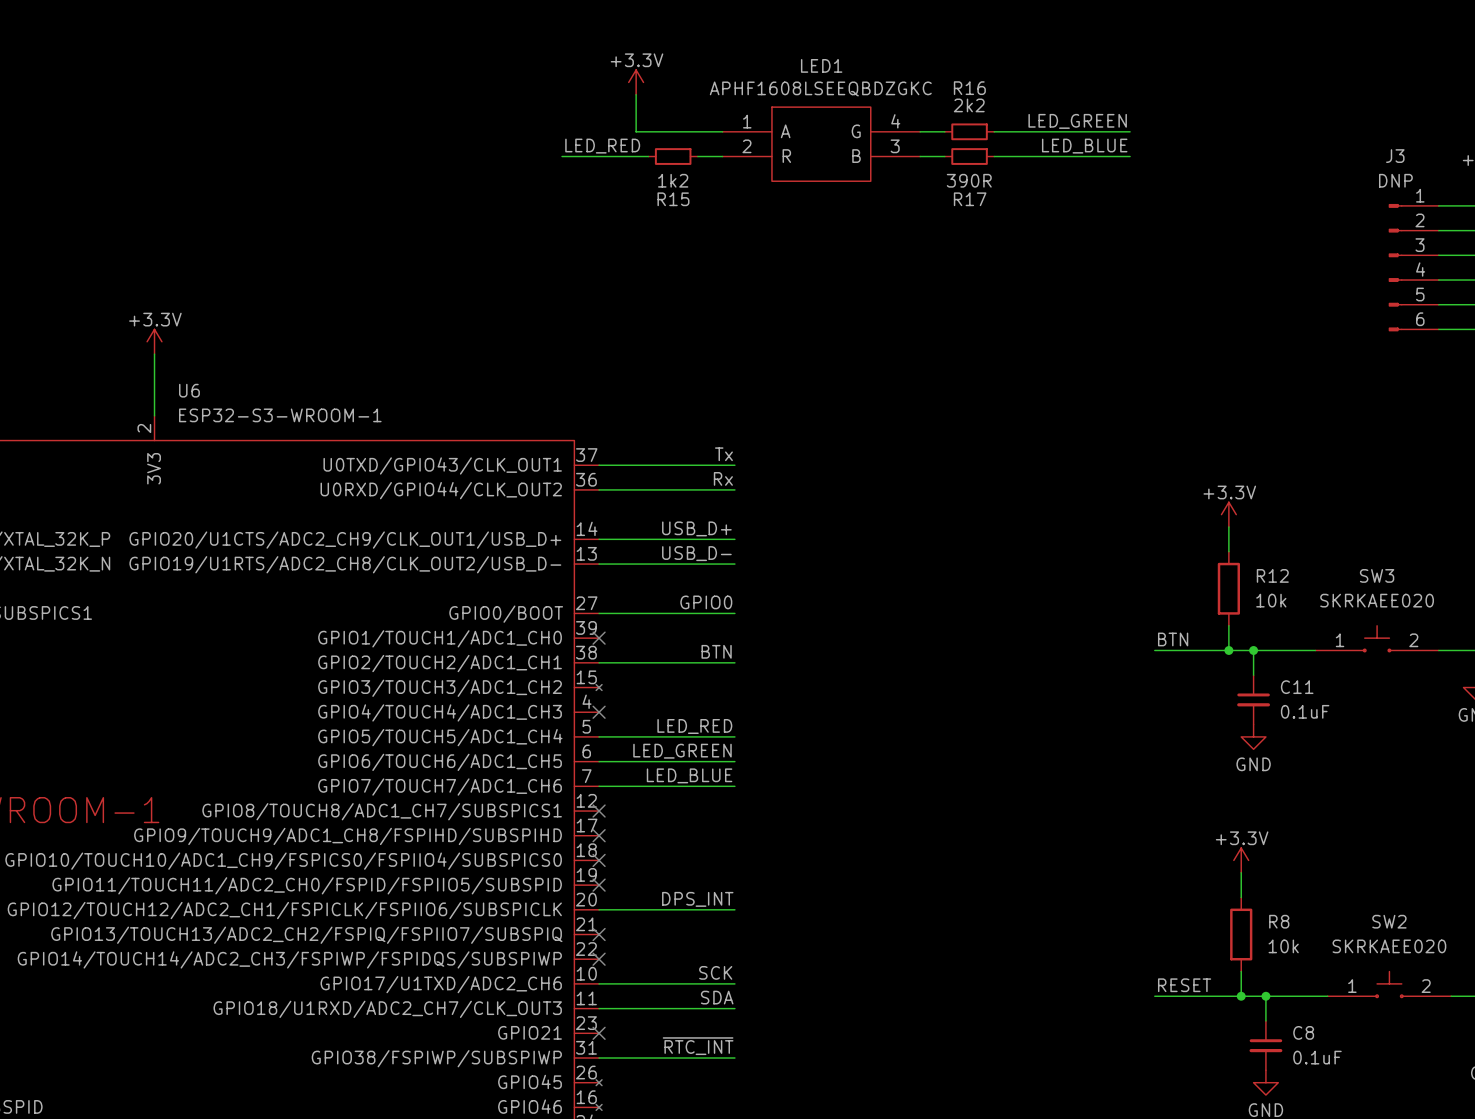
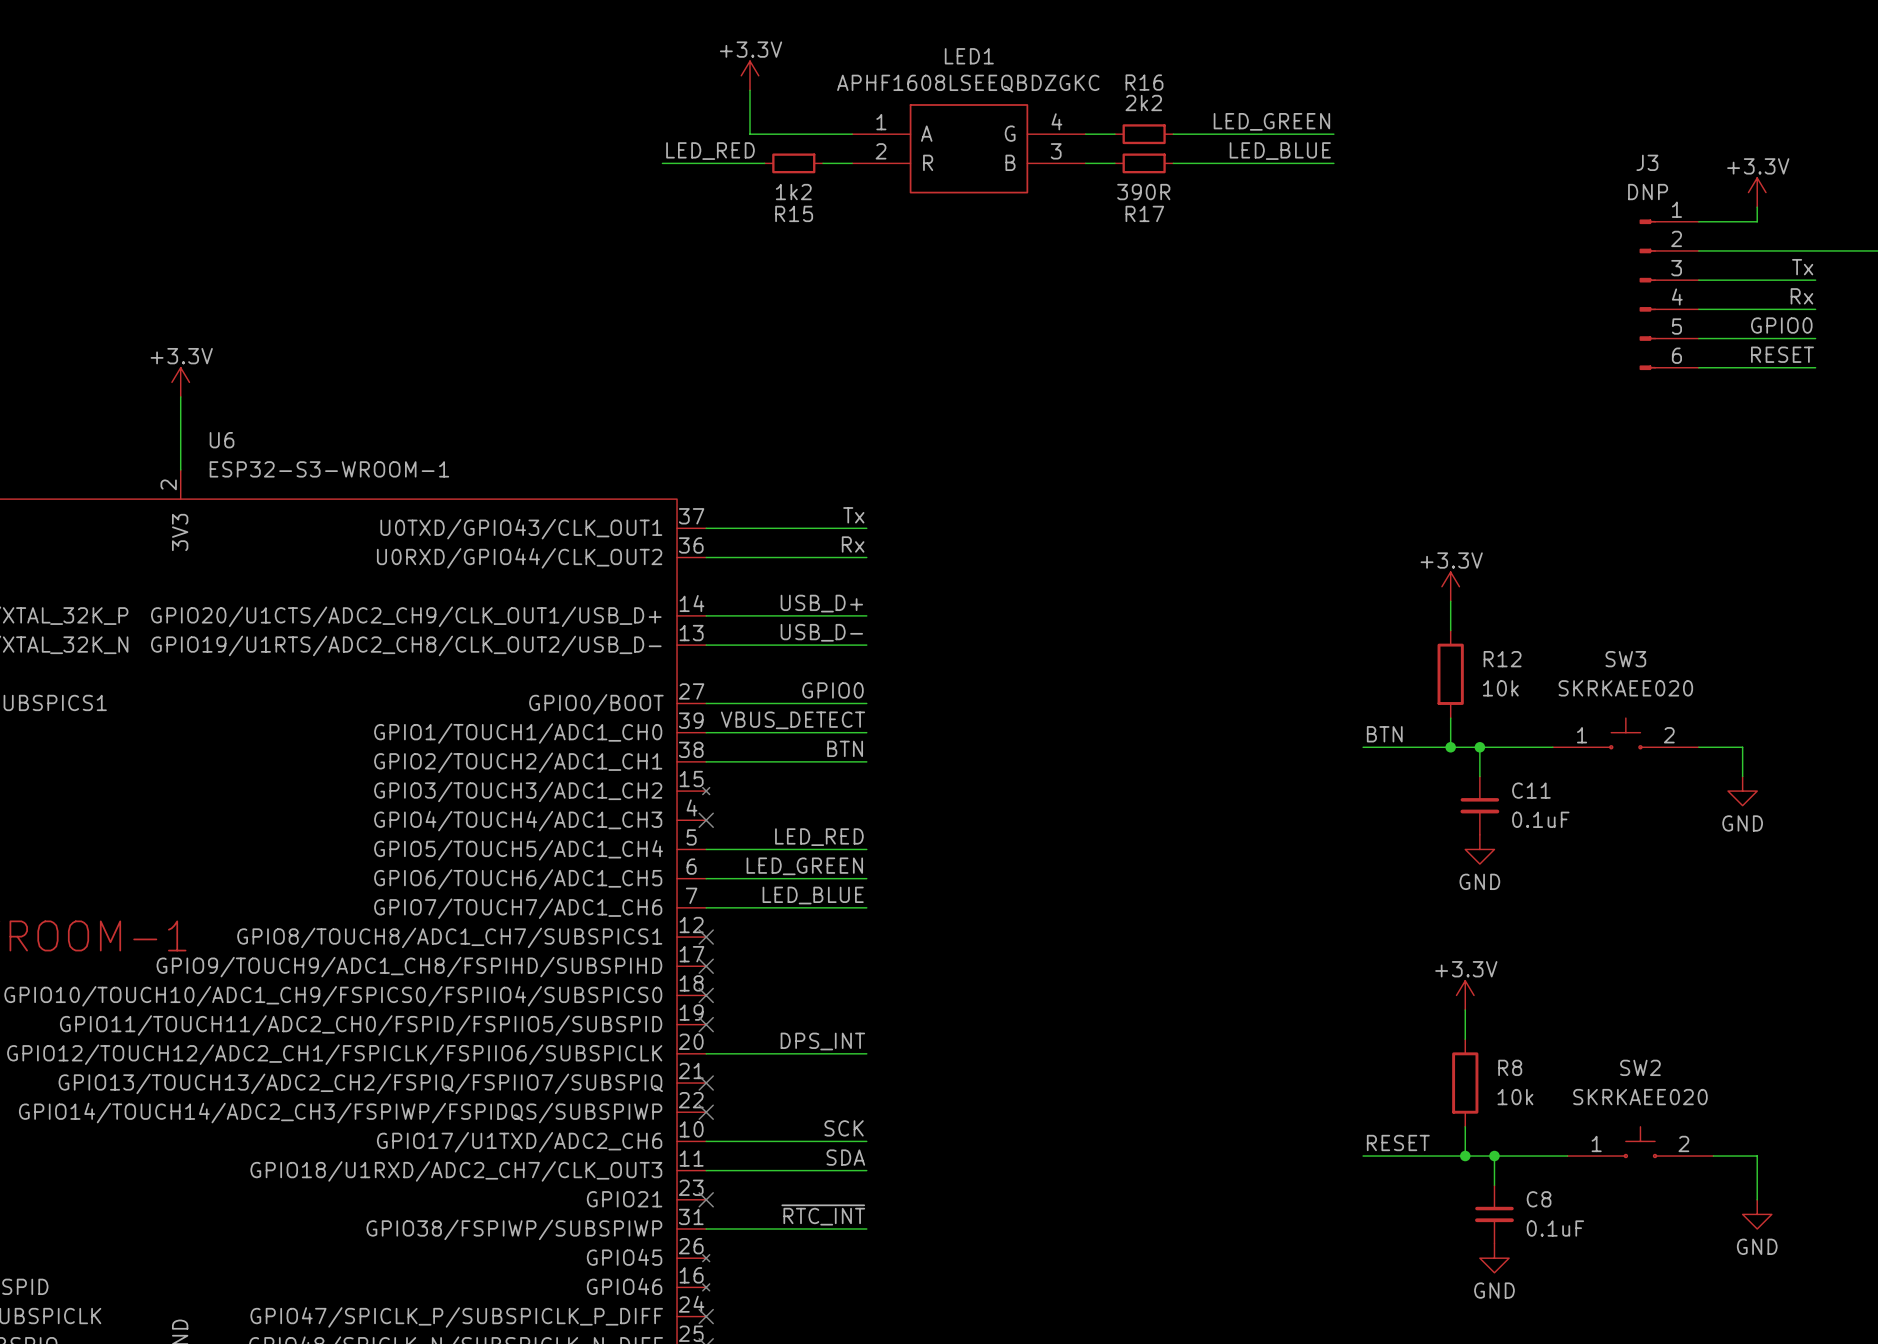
label: none -> VBUS_DETECT (792, 720)
wire: none -> (706, 732) (866, 732)
no-connect mark: (599, 638) -> none

